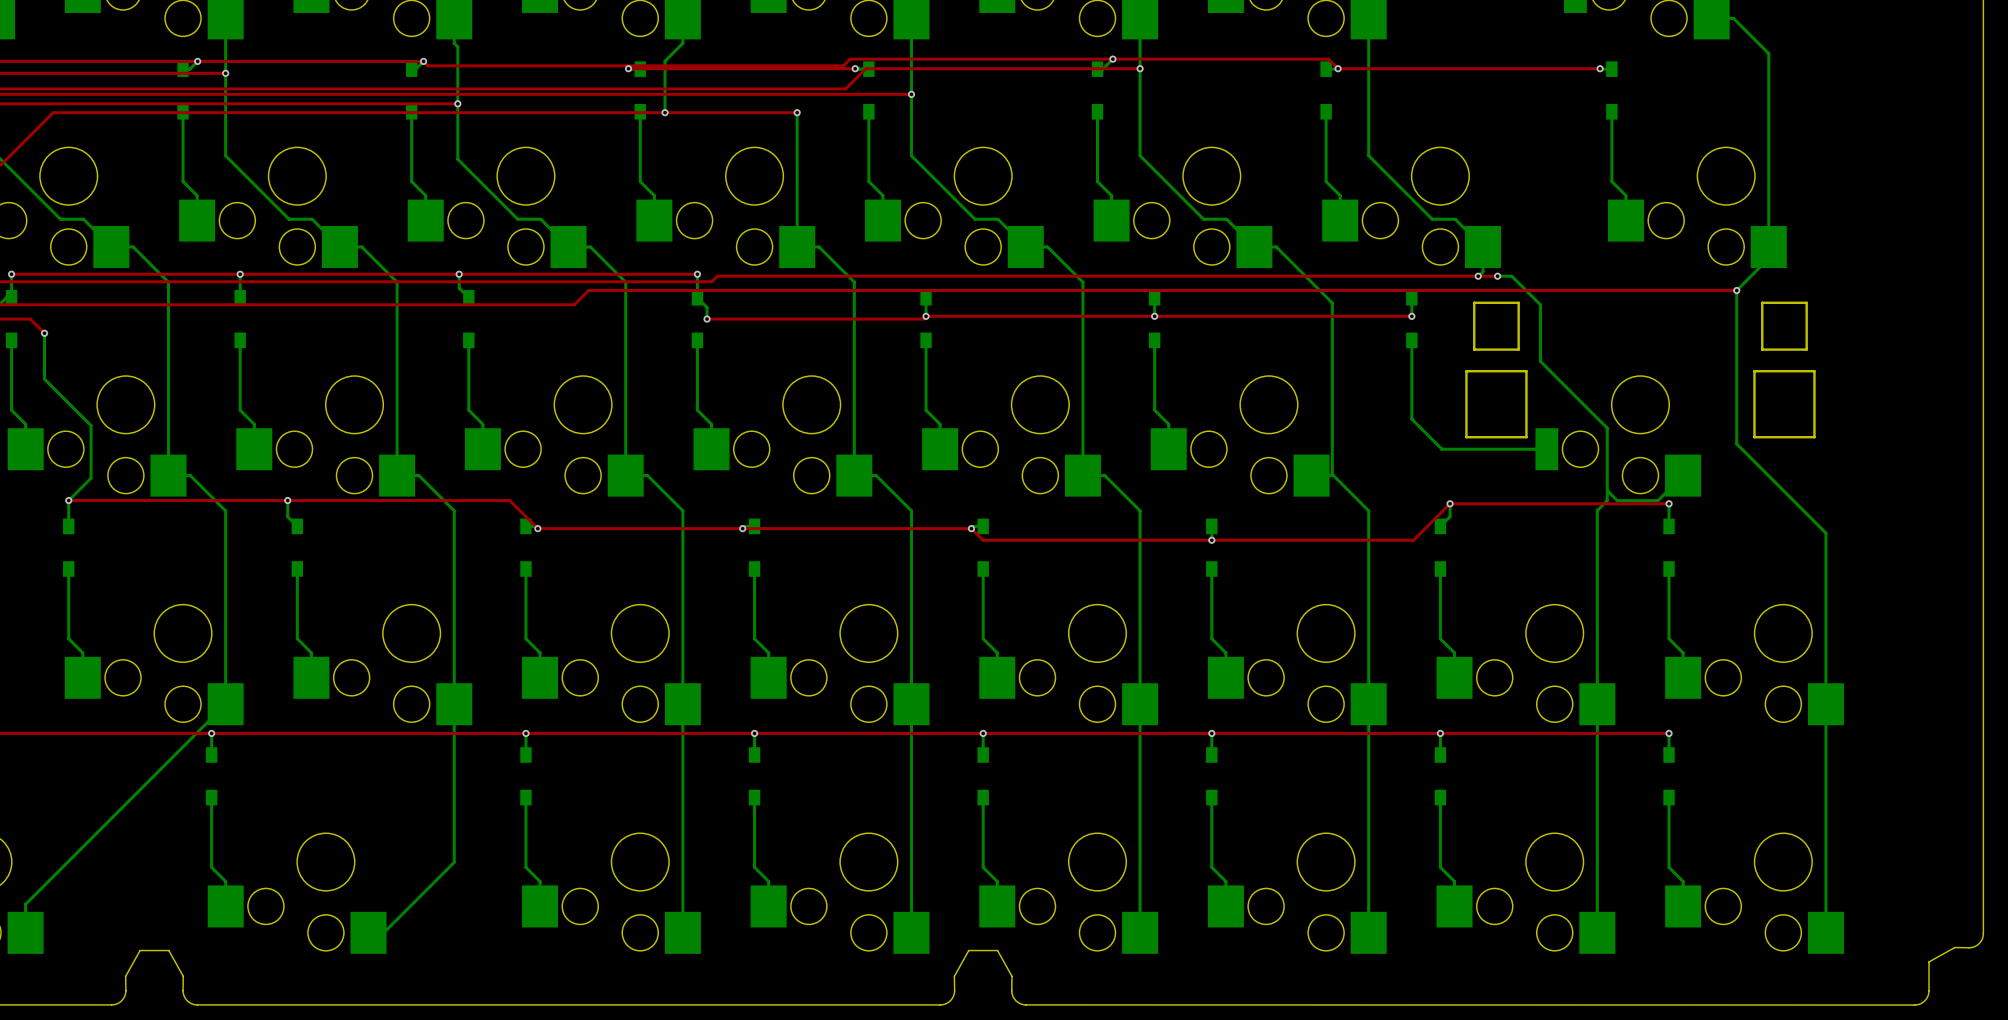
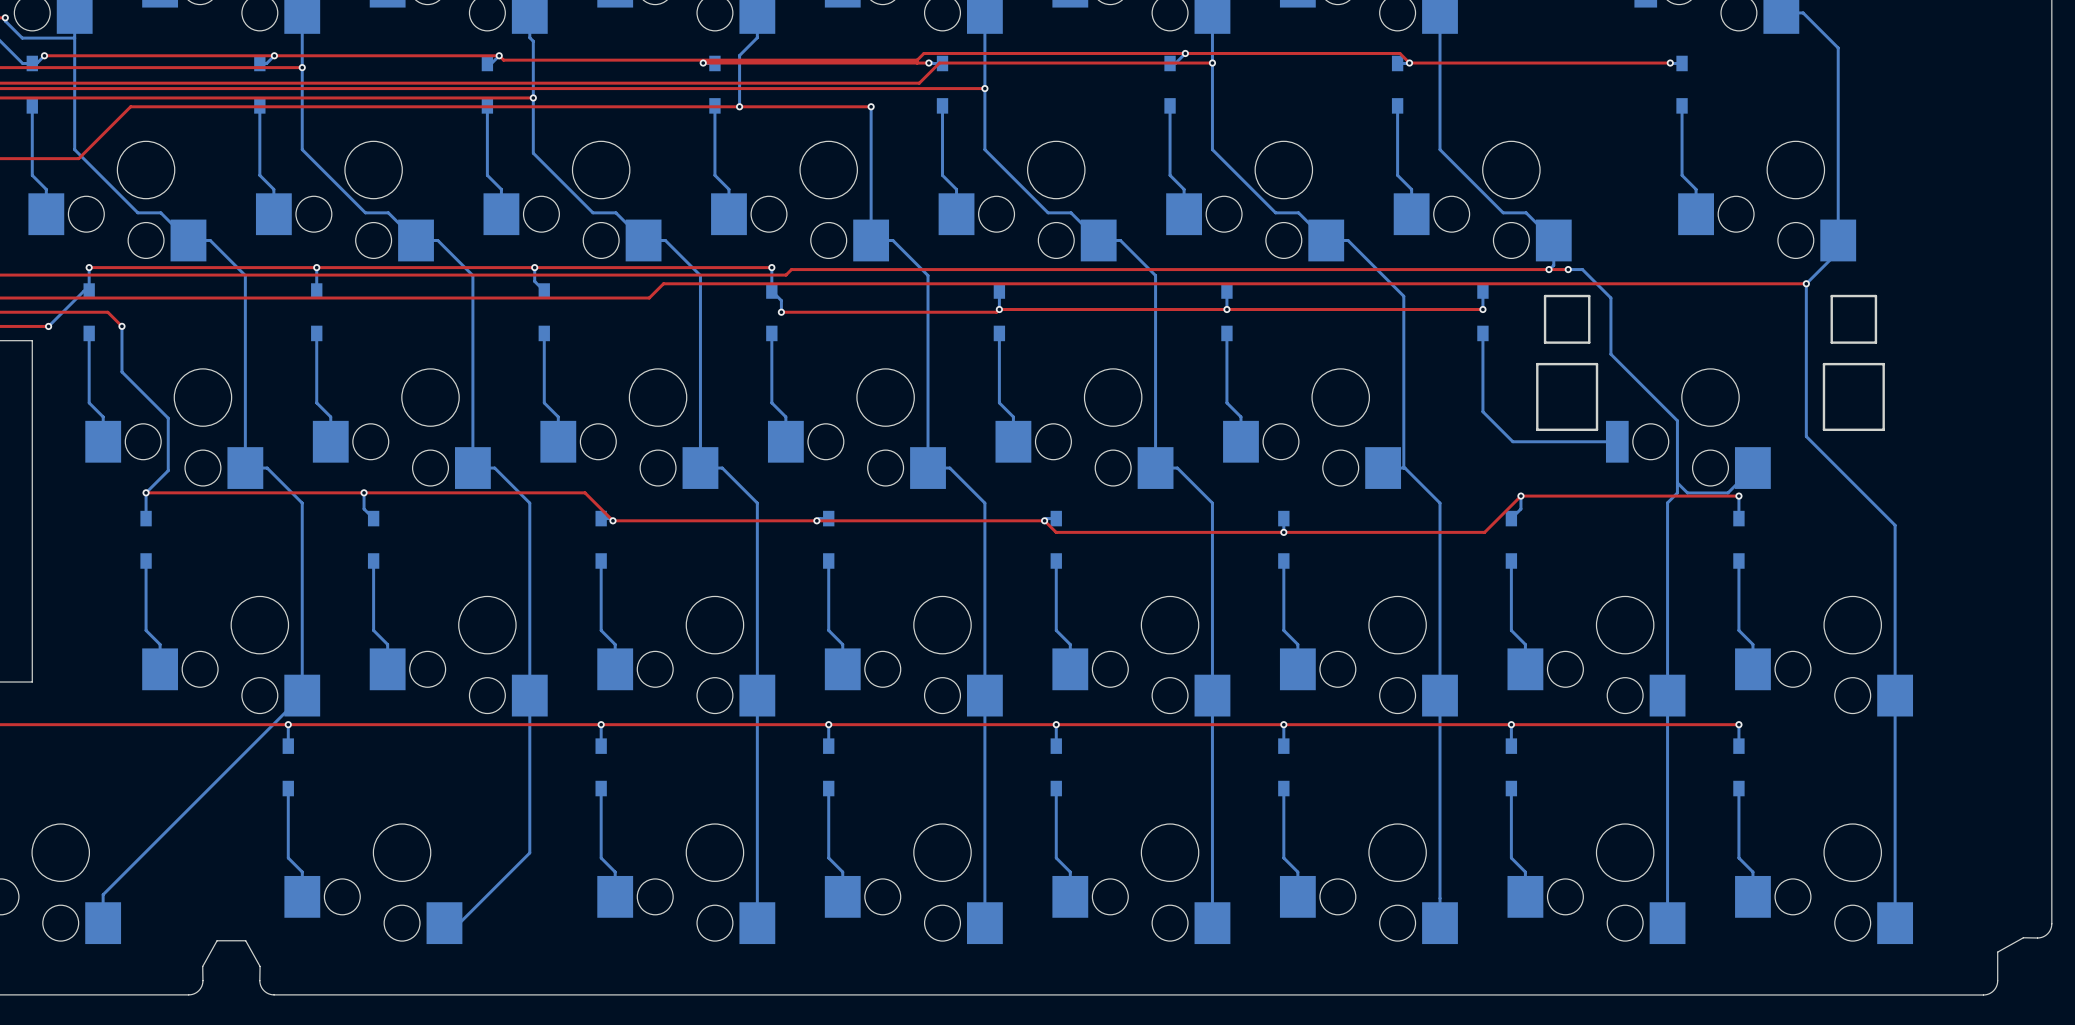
board edge: (197, 1004) (942, 1004) (949, 1001) (953, 996) (954, 976) (968, 950) (997, 950) (1011, 976) (1013, 996) (1017, 1001) (1024, 1004) (1914, 1005) -> (274, 994) (1983, 995)

